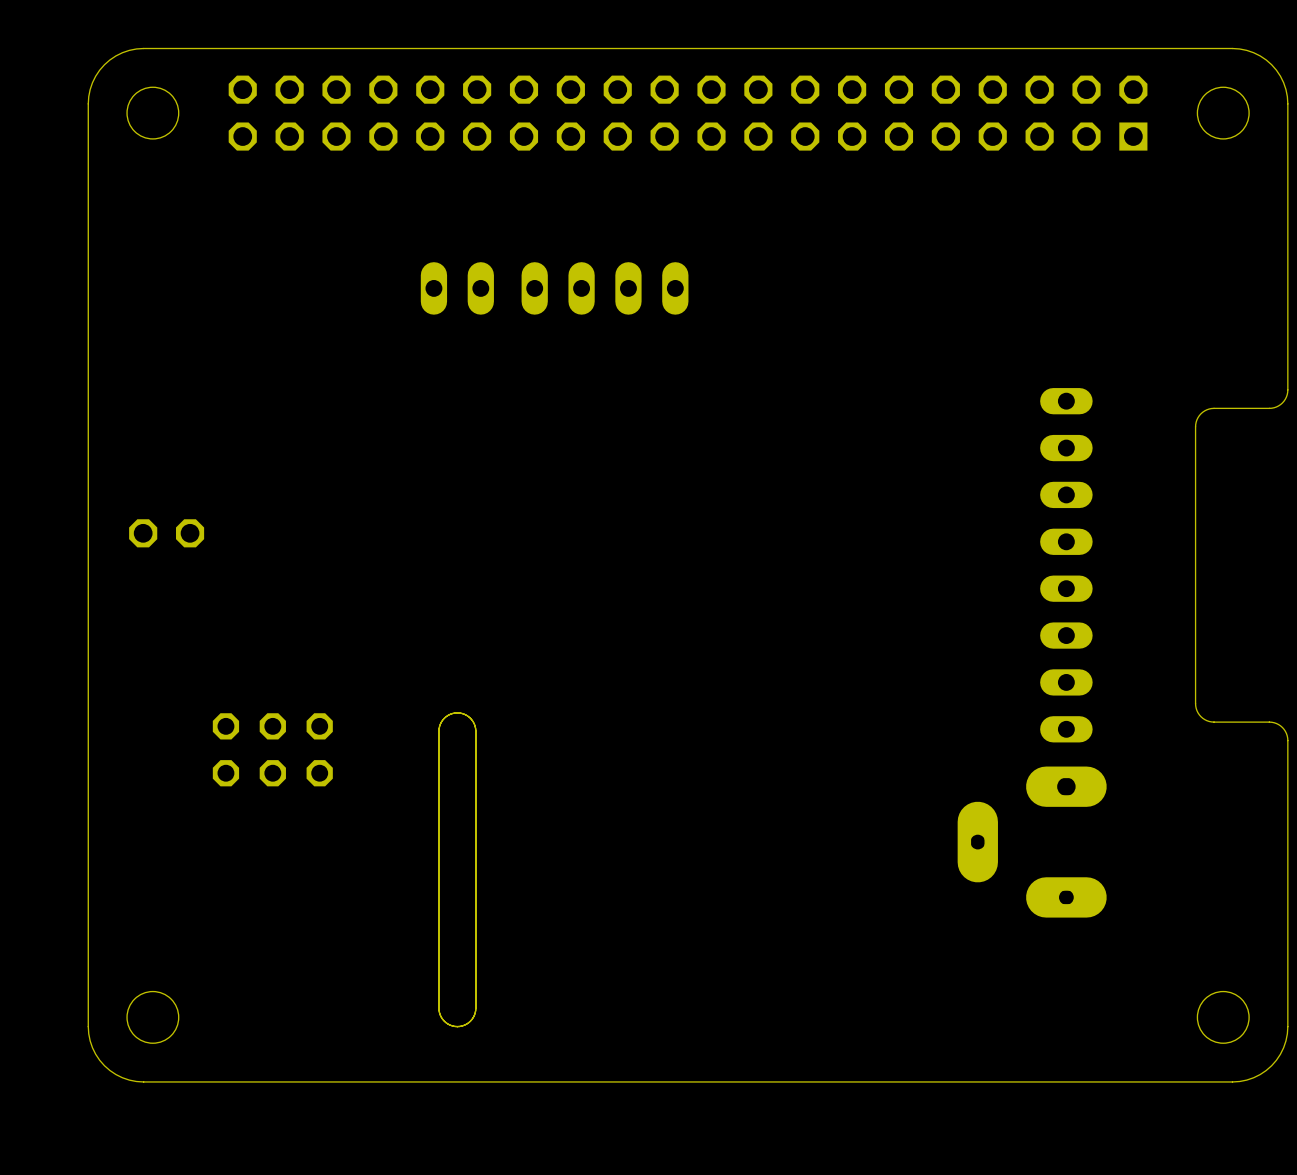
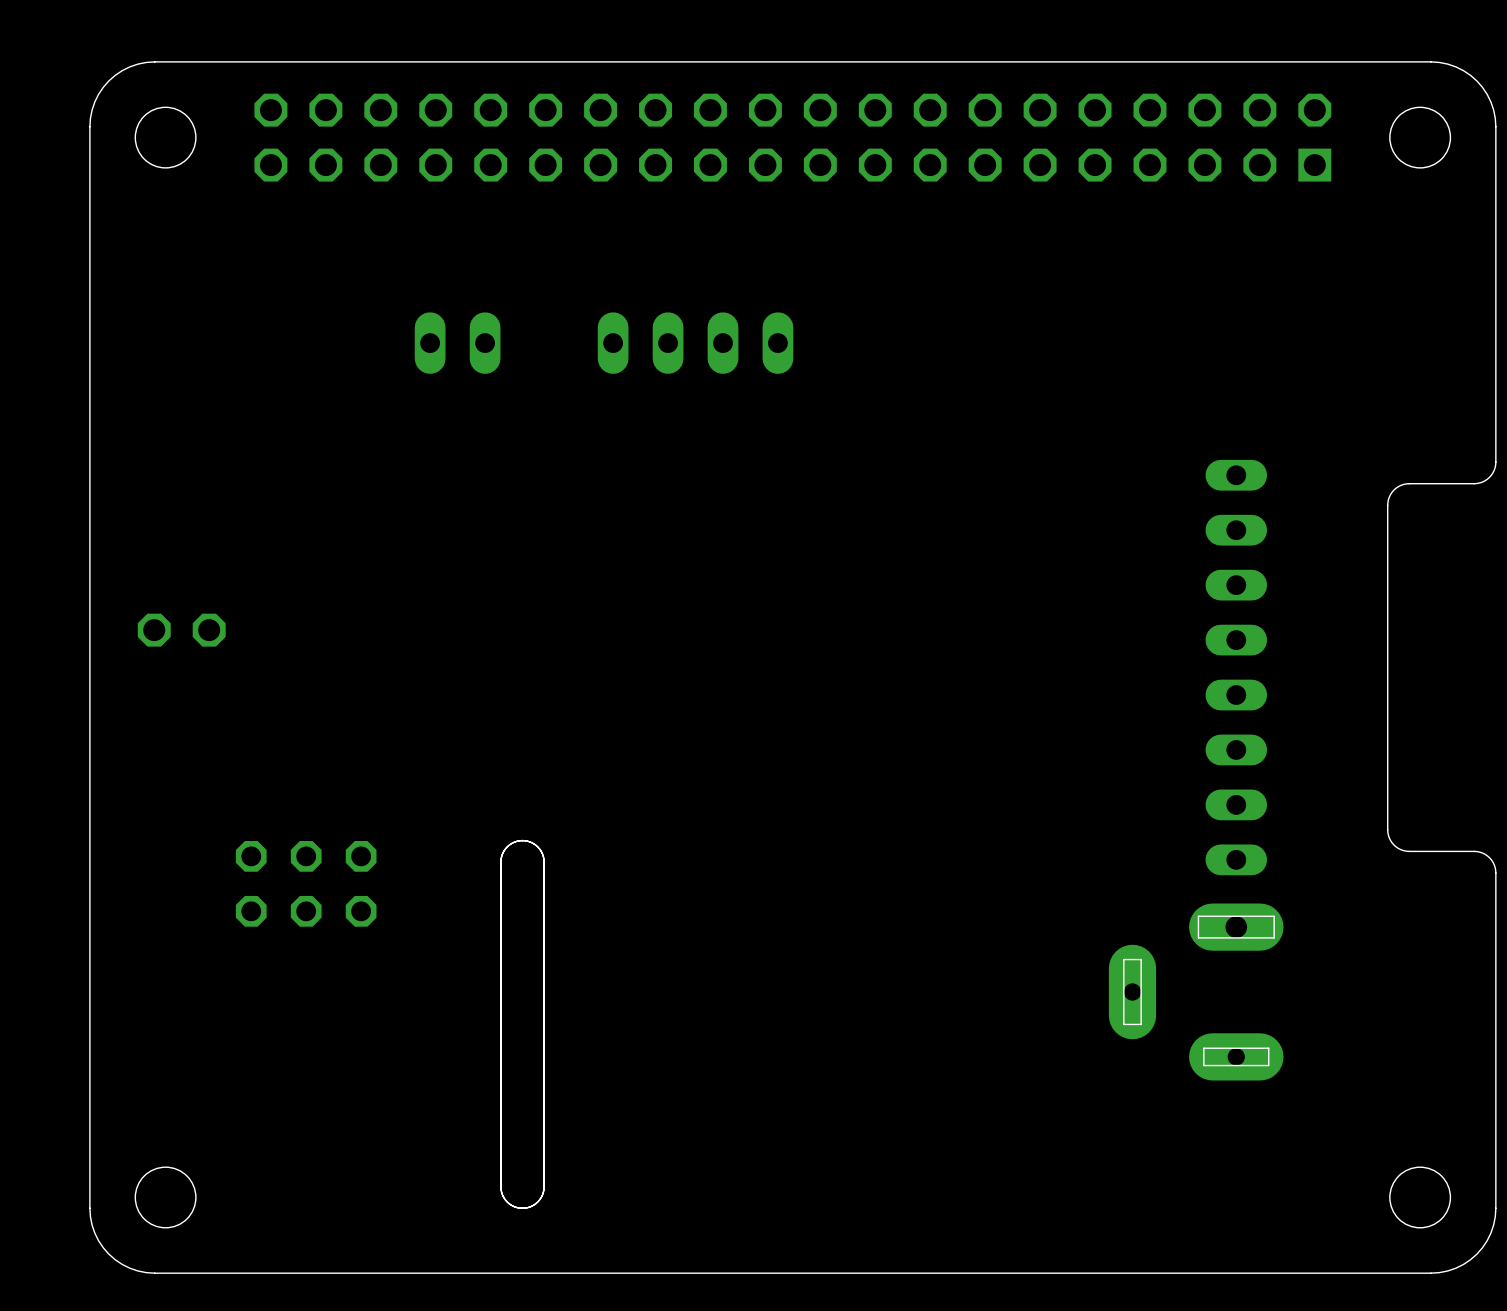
part position: (457, 288) -> (457, 343)

